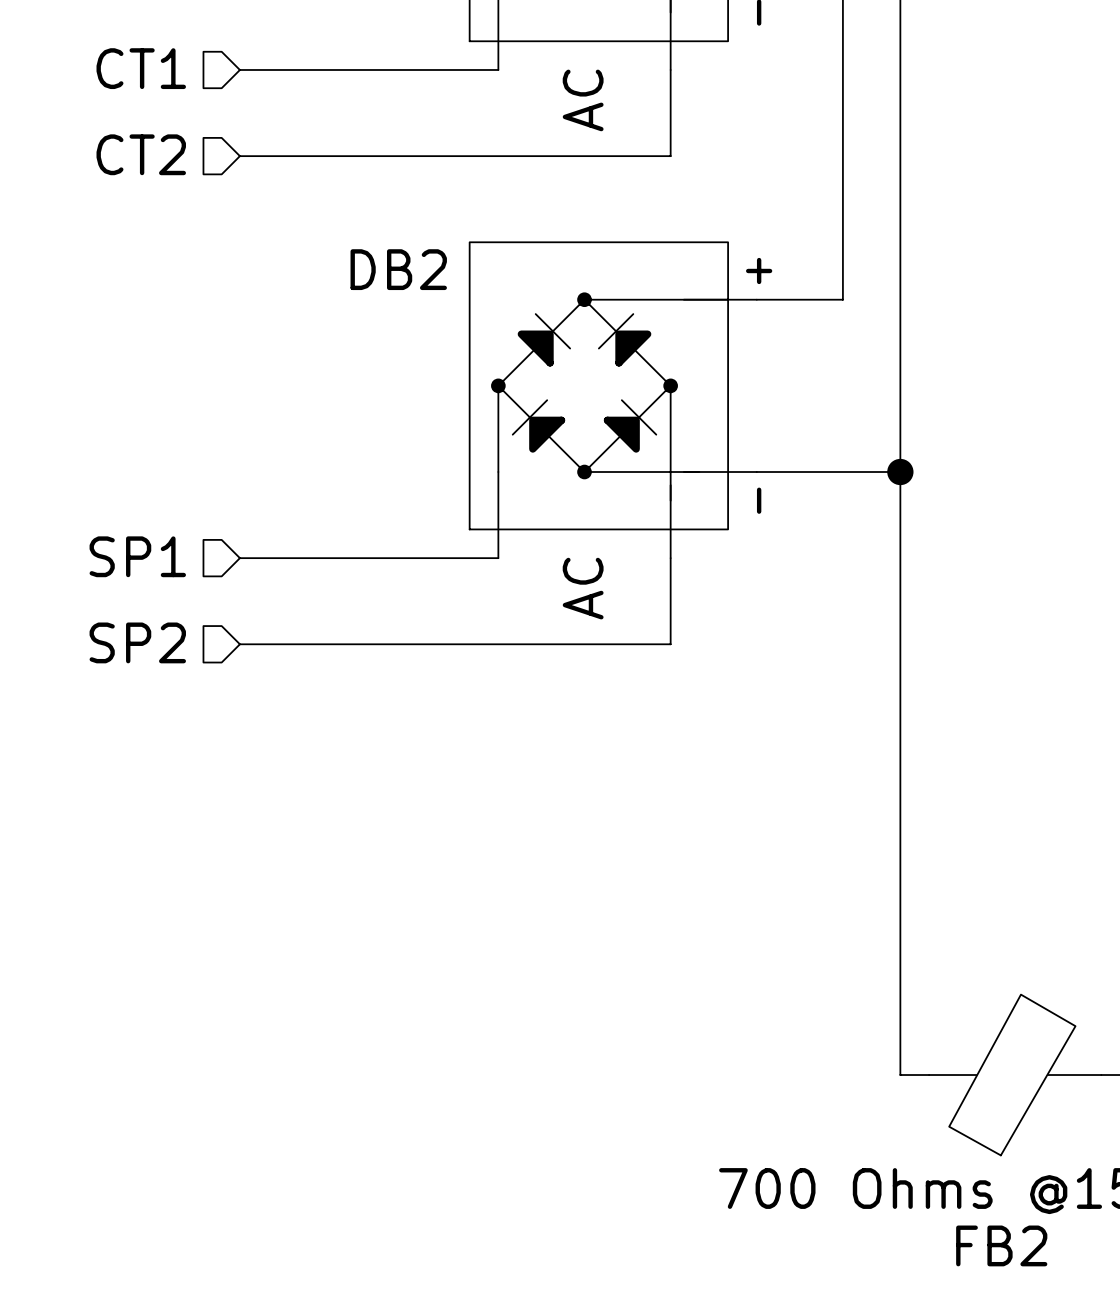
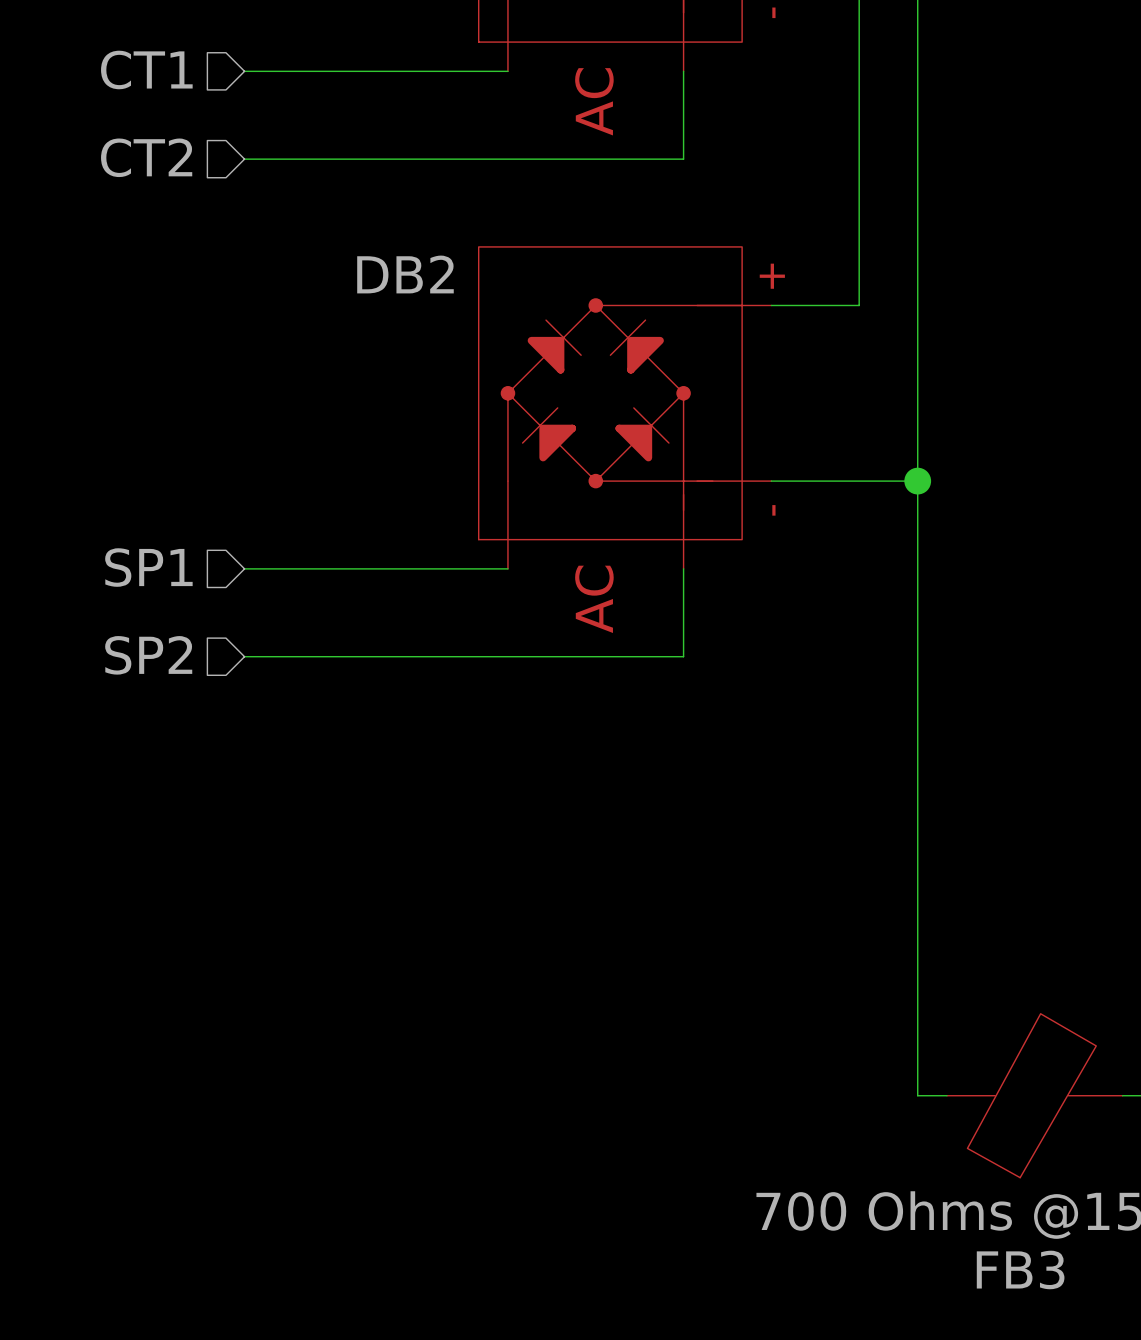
FB2 name: FB2 (1001, 1245) -> FB3 (1020, 1269)

